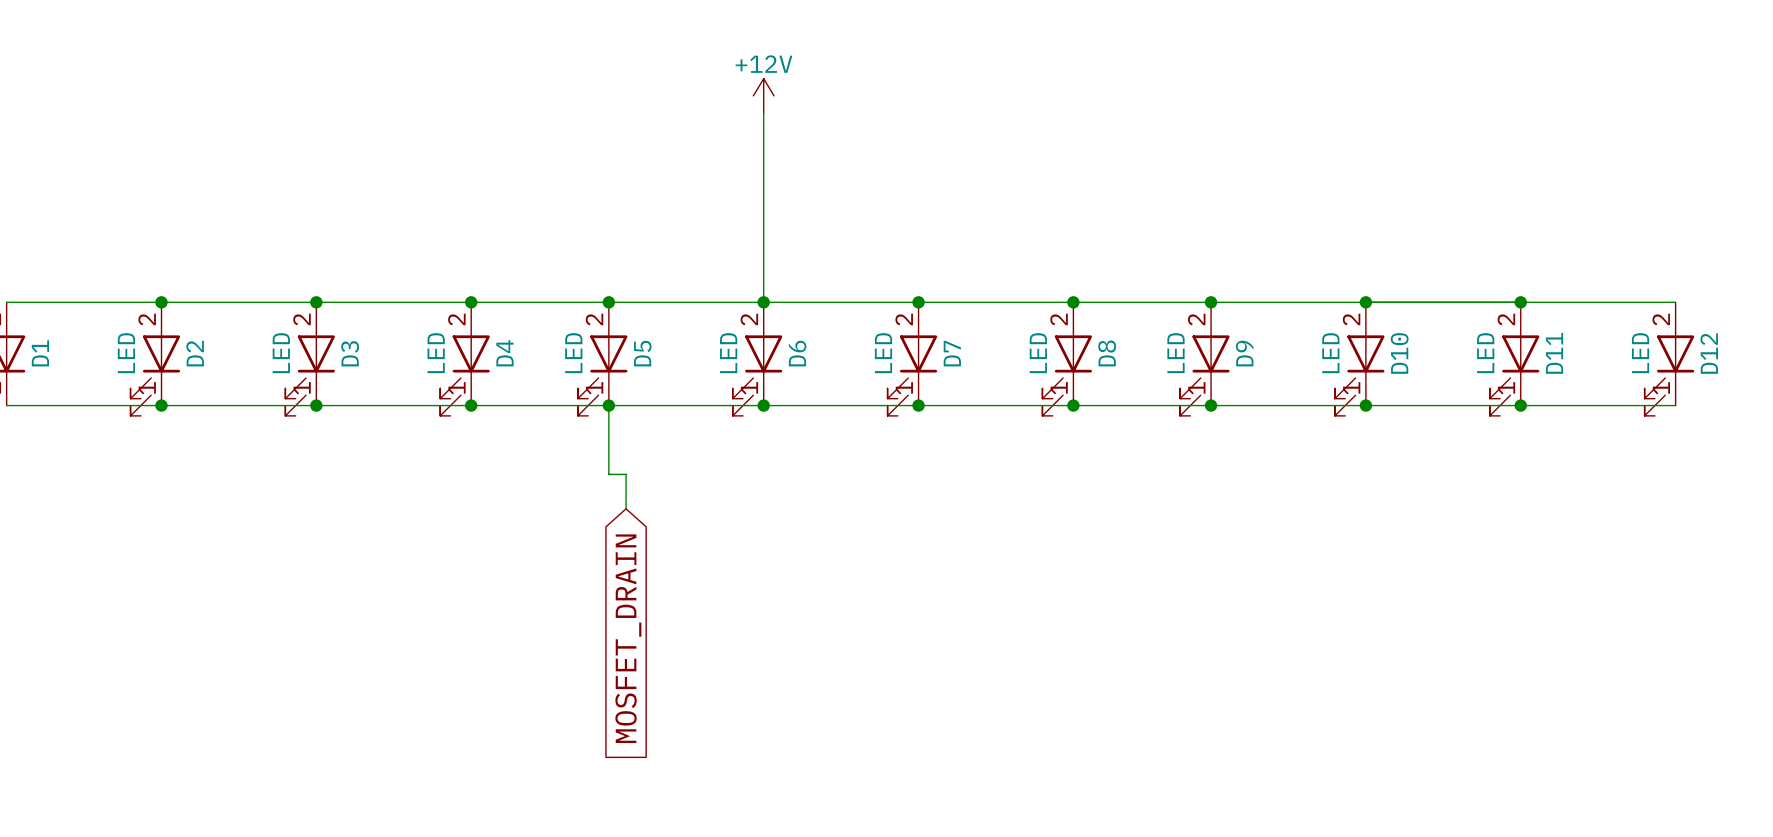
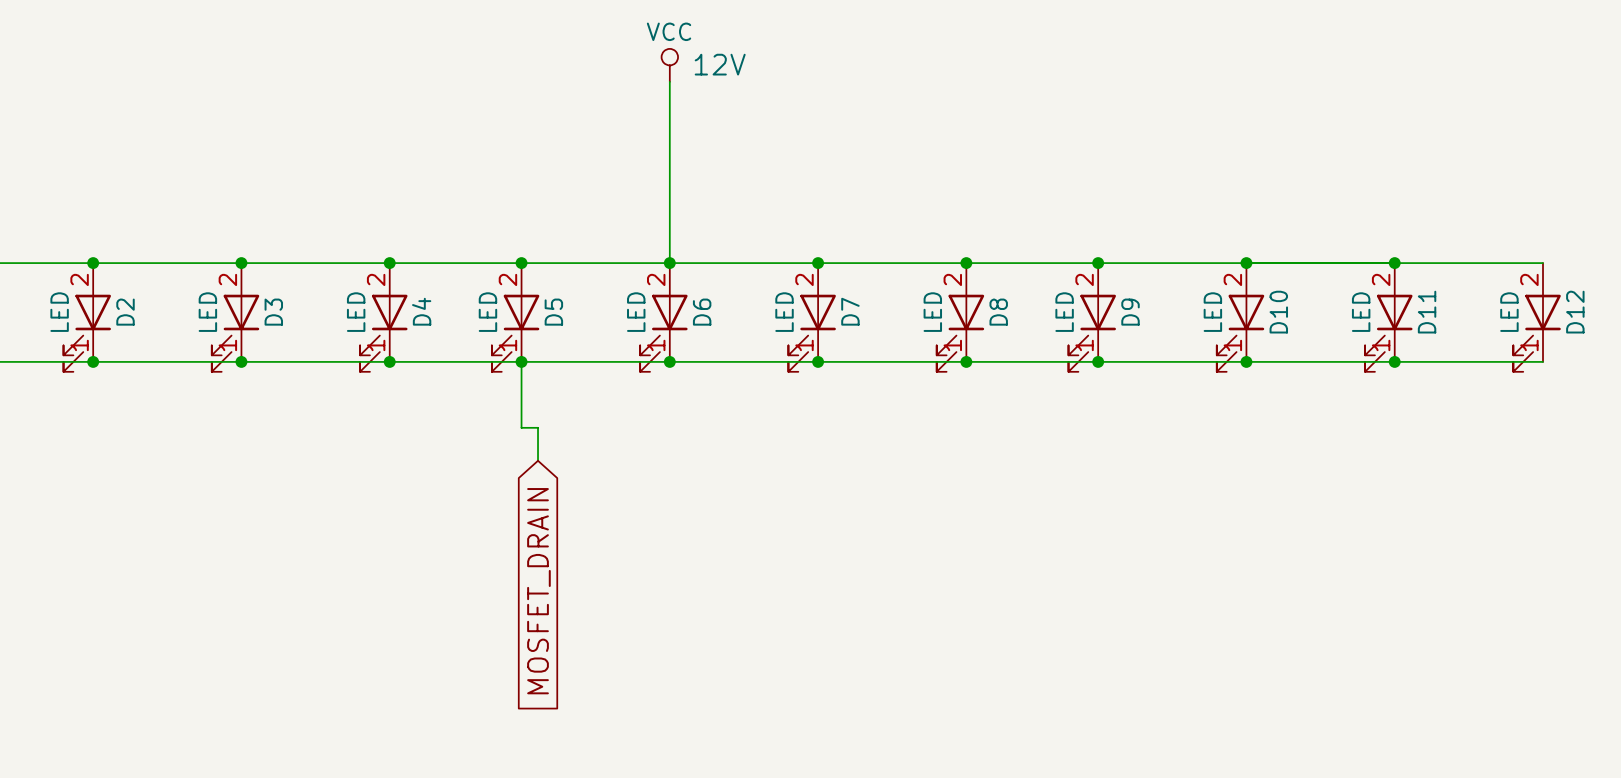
power symbol: +12V (763, 95) -> VCC (669, 65)

